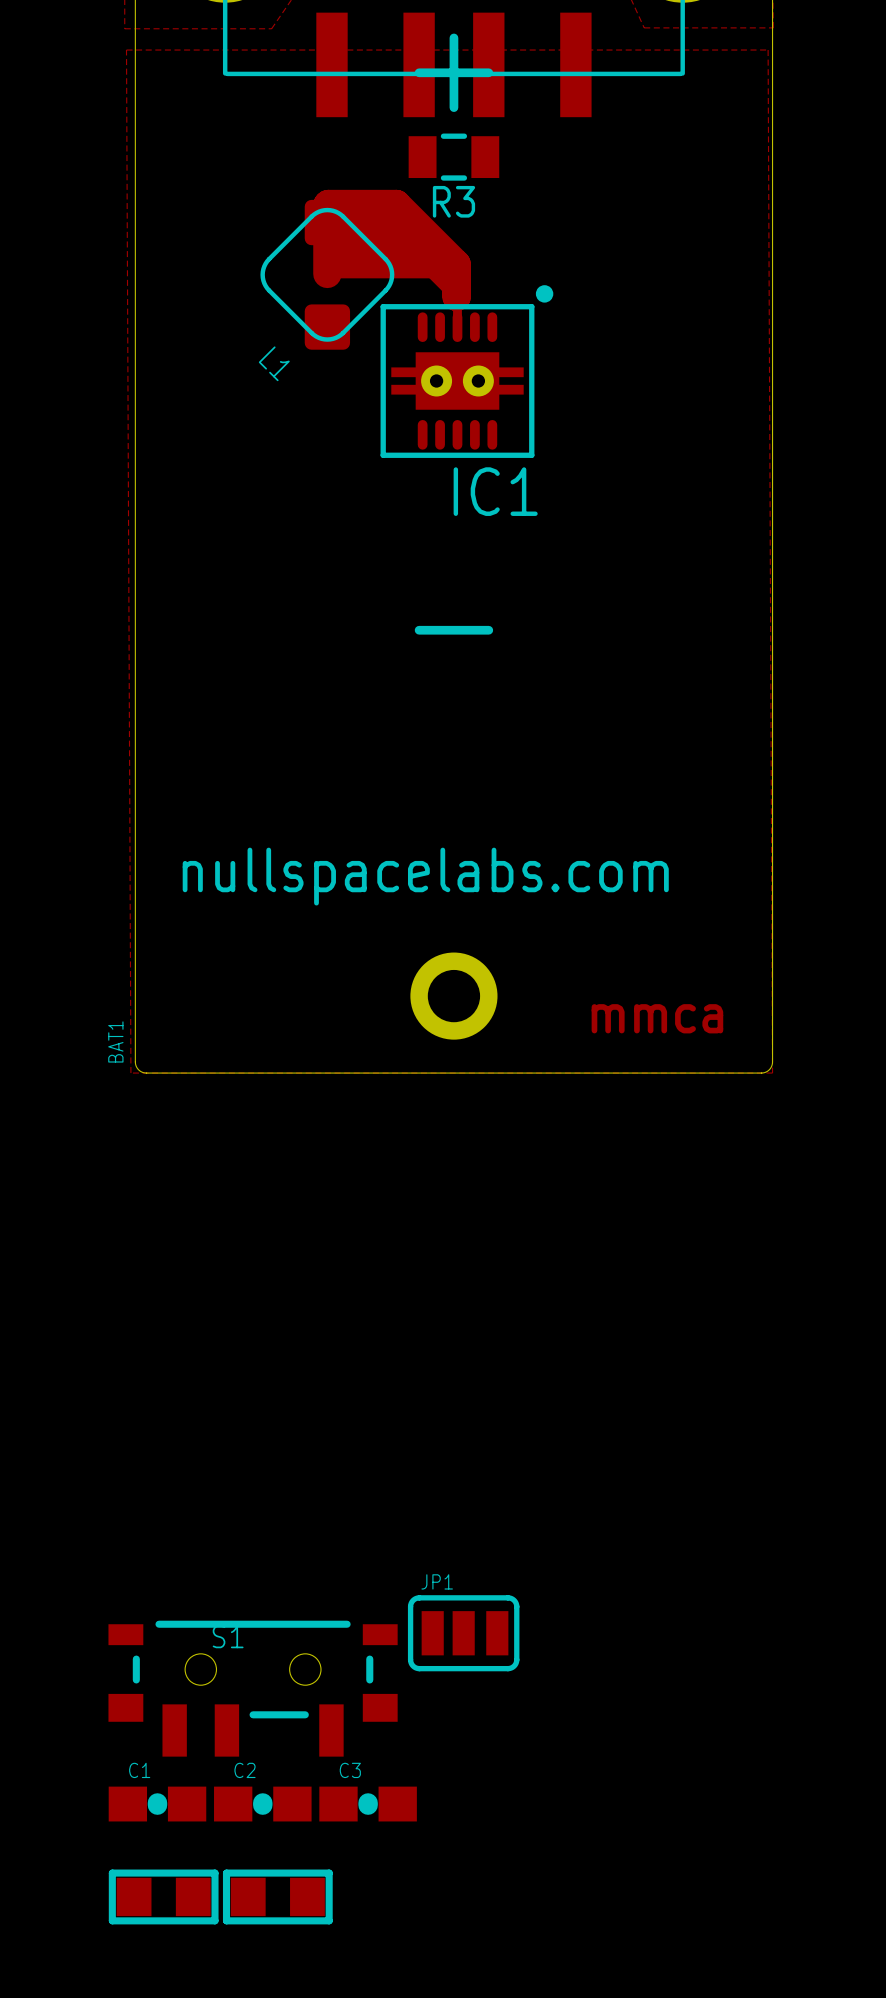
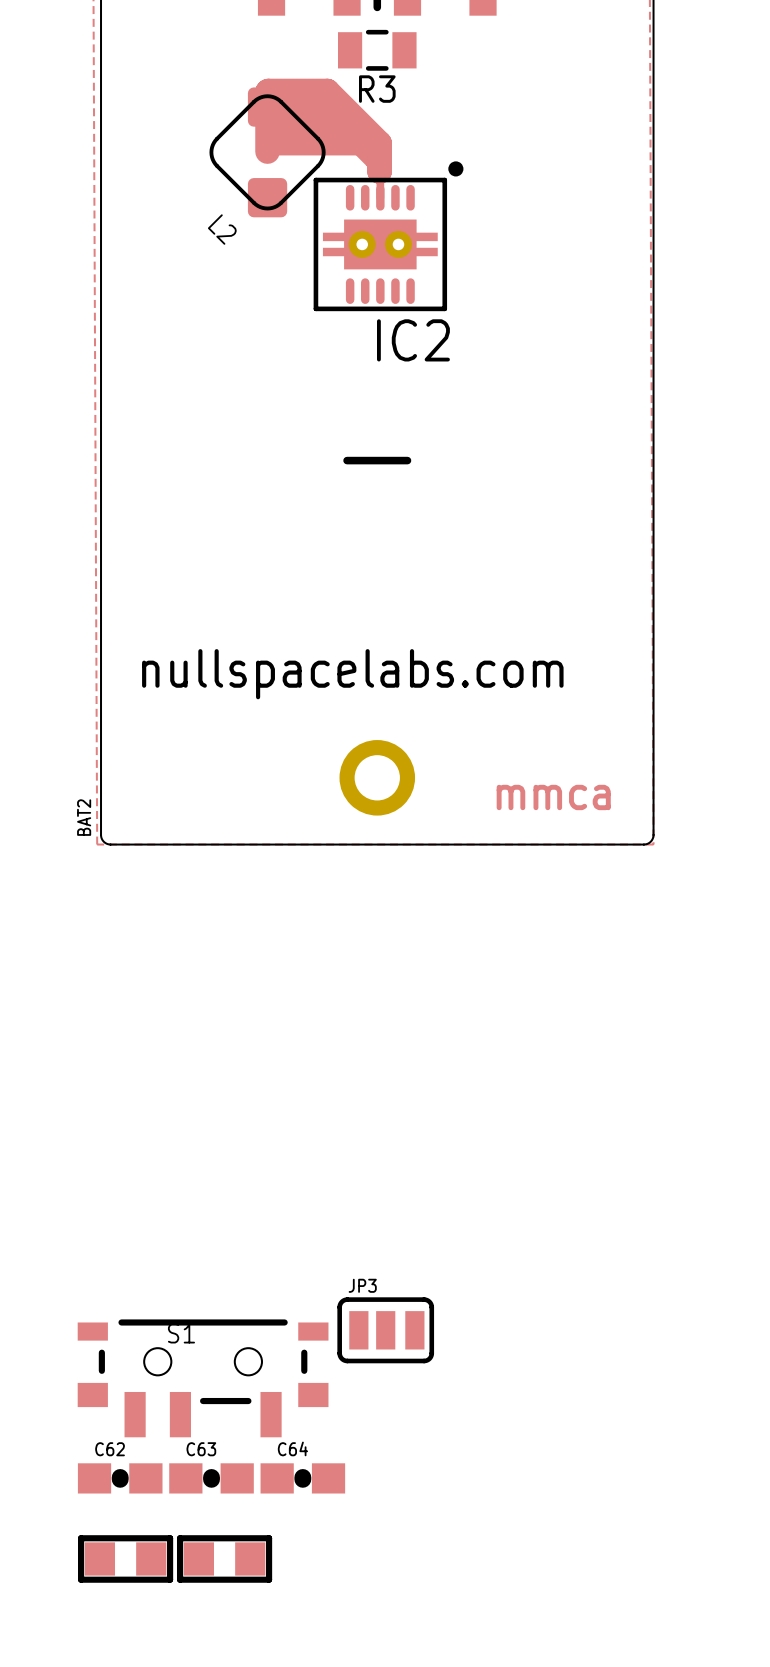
L1 name: L1 (274, 363) -> L2 (222, 229)
IC1 name: IC1 (495, 491) -> IC2 (413, 340)
BAT1 name: BAT1 (115, 1041) -> BAT2 (84, 817)
JP1 name: JP1 (437, 1581) -> JP3 (362, 1285)
C1 name: C1 (139, 1770) -> C62 (110, 1449)
C2 name: C2 (245, 1770) -> C63 (201, 1449)
C3 name: C3 (350, 1770) -> C64 (292, 1448)

